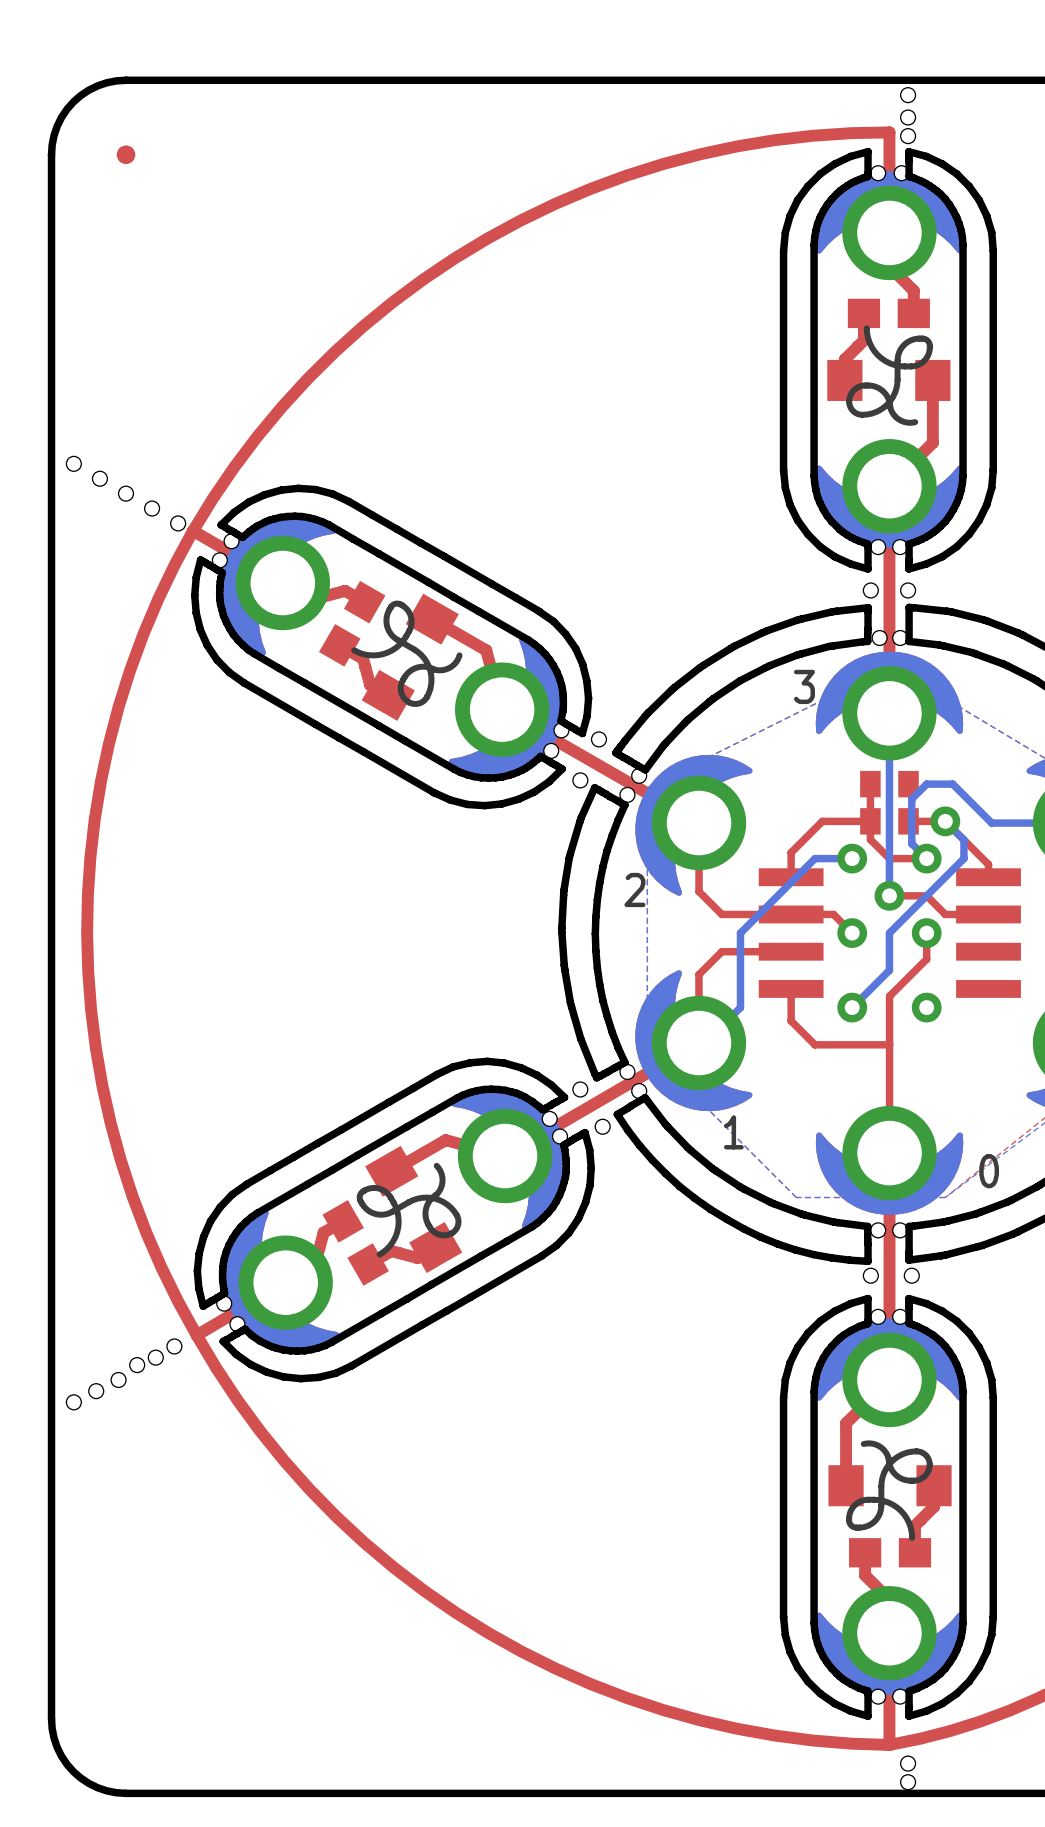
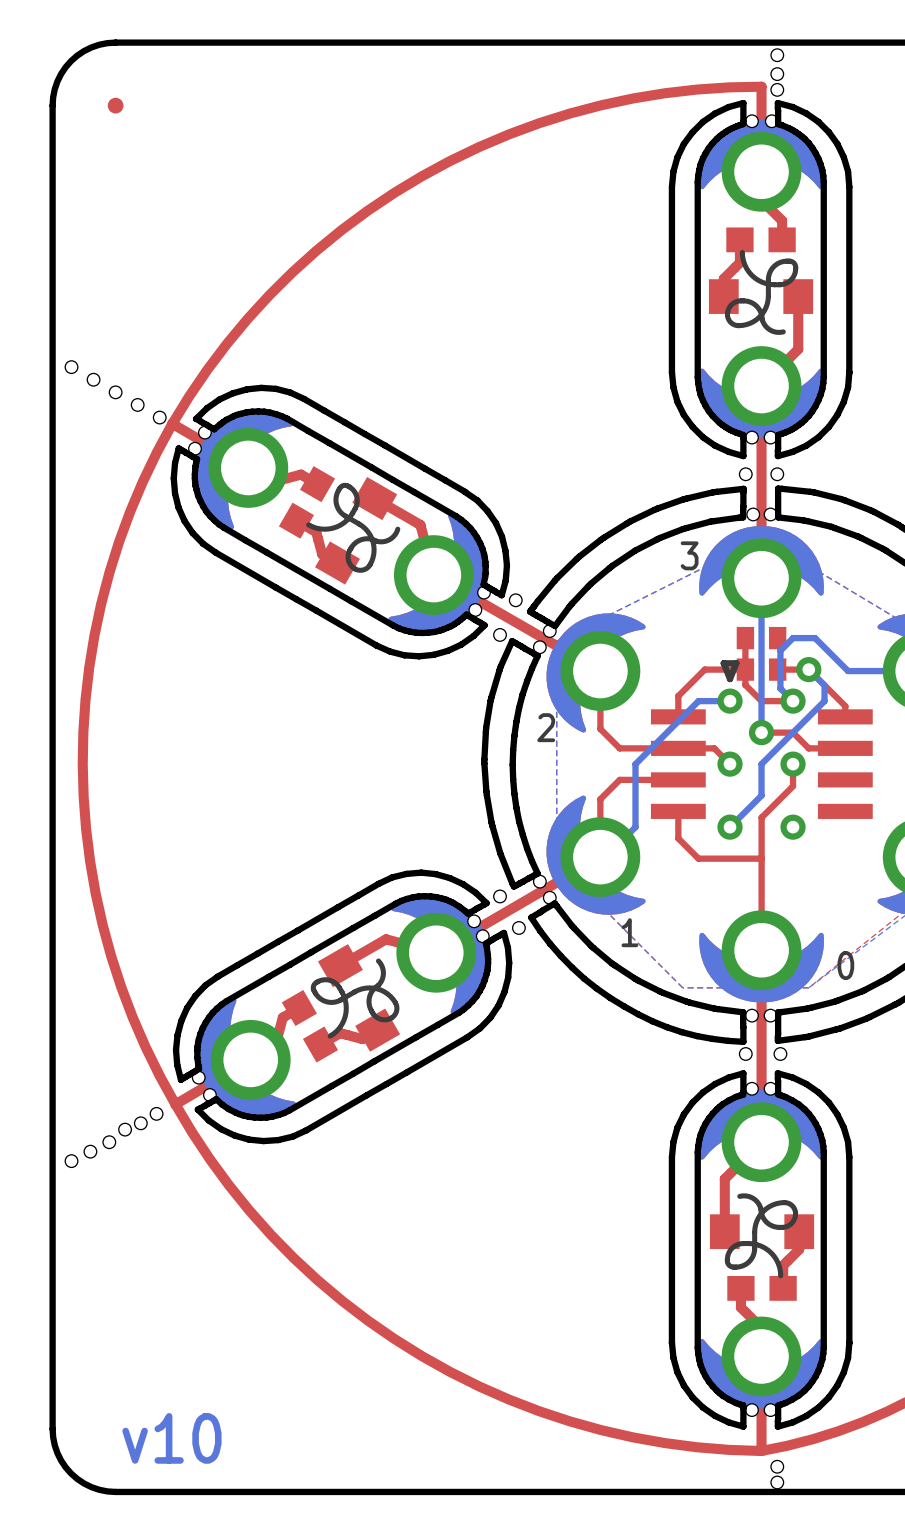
line: none -> (736, 663) (730, 679) (723, 663) (736, 663)
text: none -> v10 (171, 1438)

